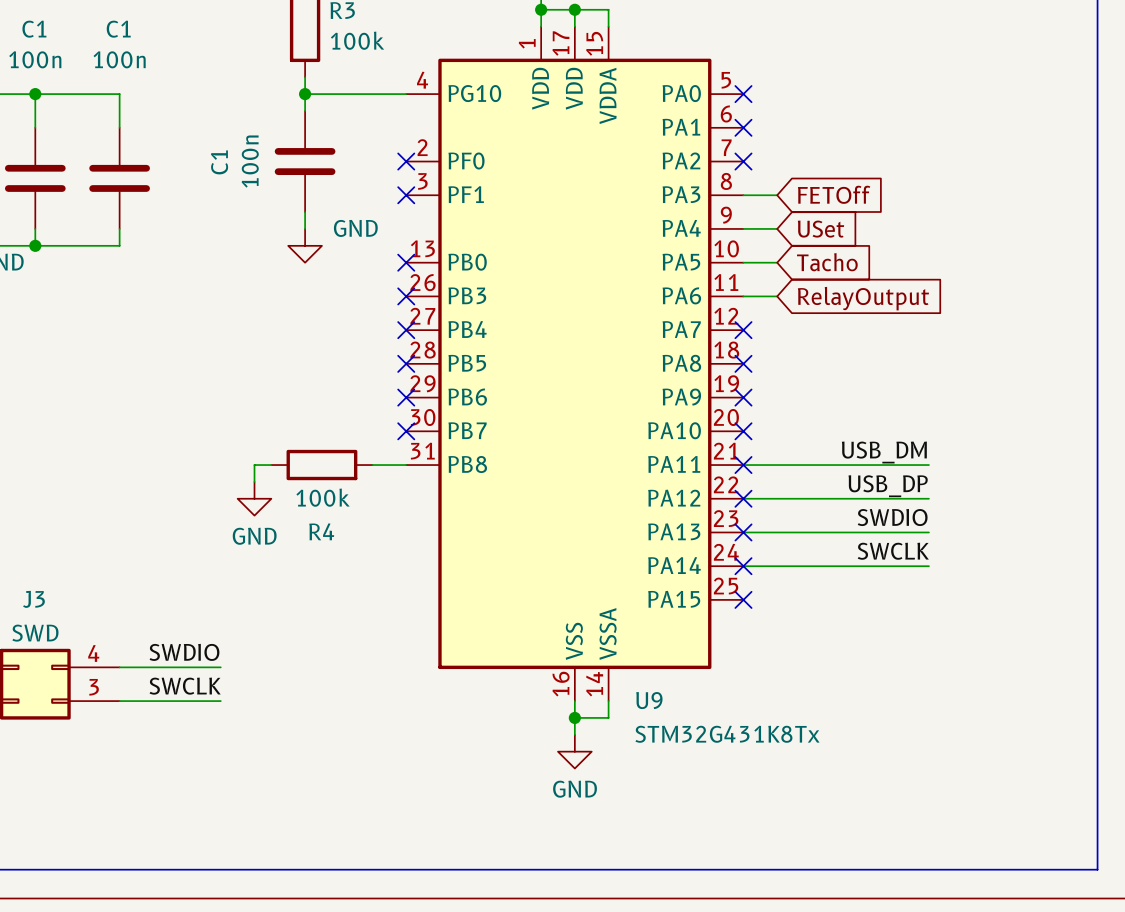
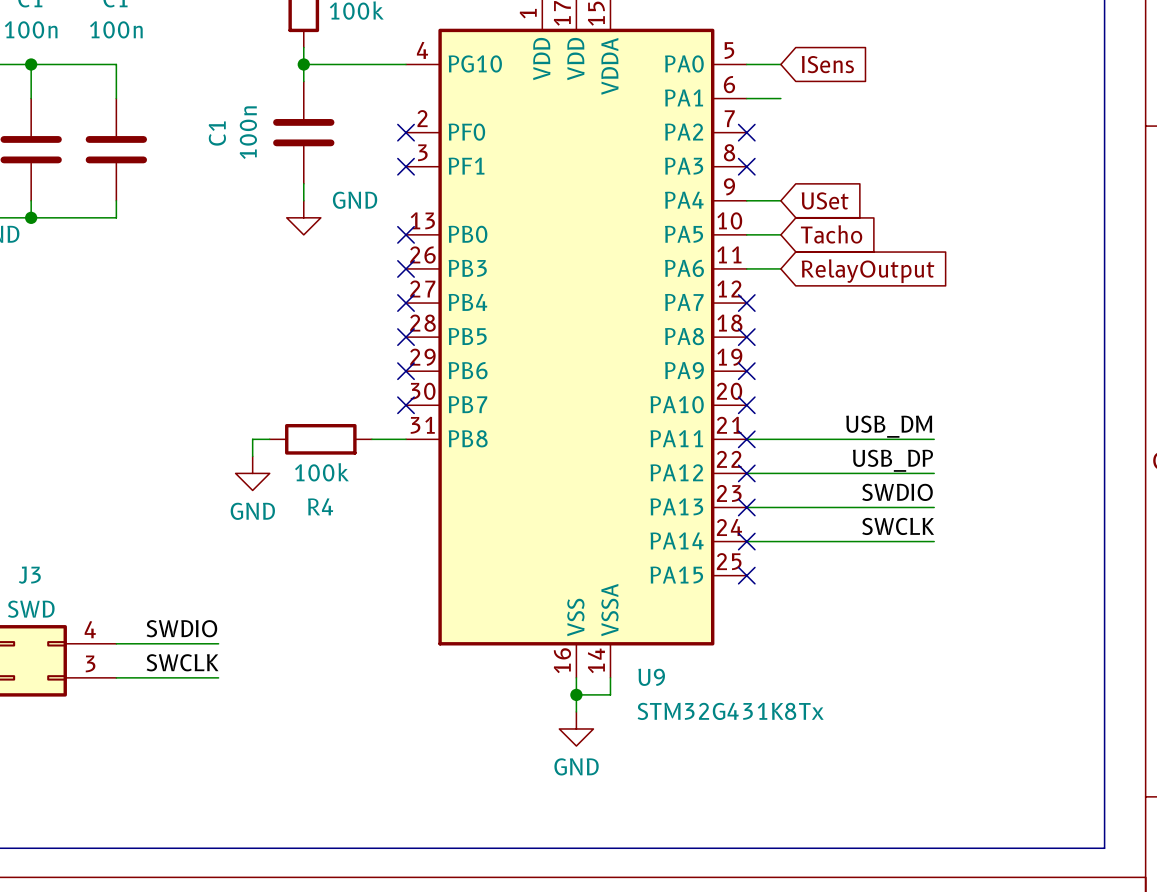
wire: none -> (746, 64) (780, 64)
no-connect mark: (743, 94) -> none
global label: none -> ISens (827, 64)
no-connect mark: (743, 127) -> none
global label: FETOff (834, 194) -> none
wire: (743, 195) (777, 195) -> (746, 98) (780, 98)
no-connect mark: none -> (746, 166)

